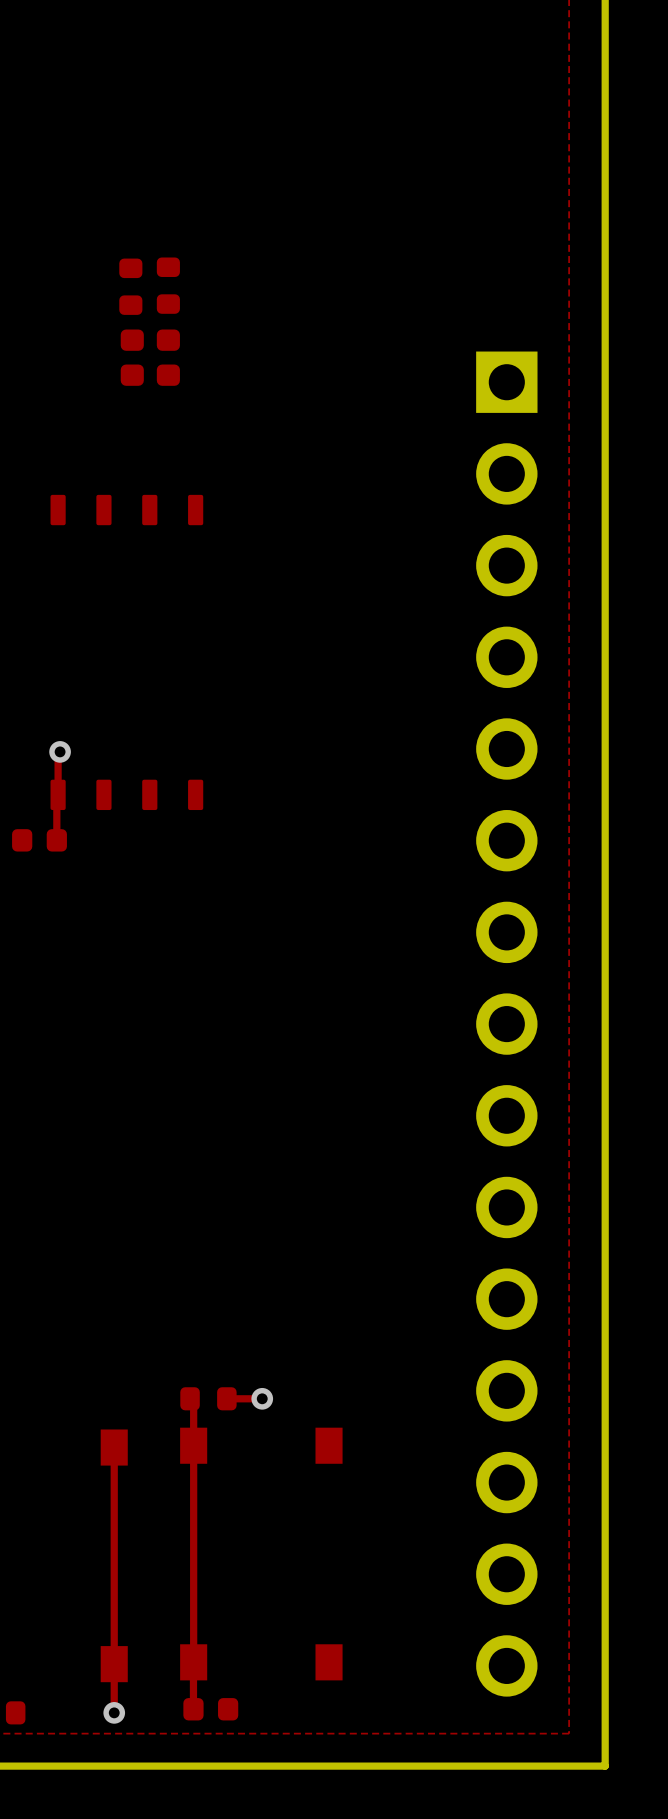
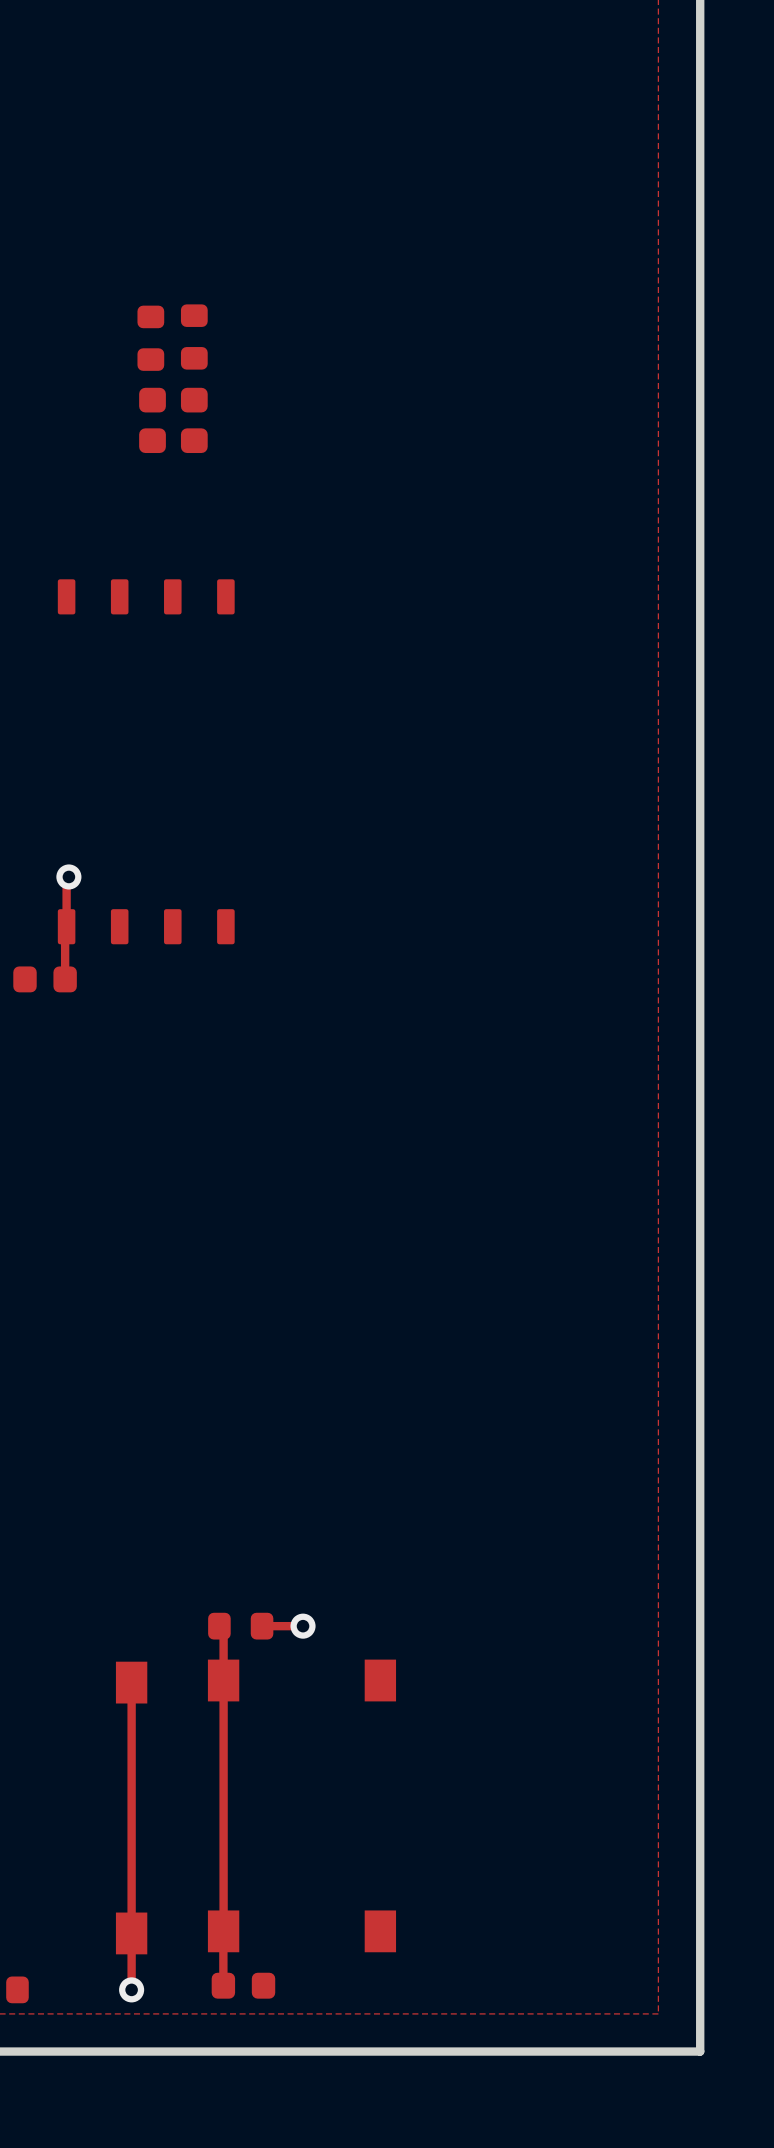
part: (506, 1024) -> none

